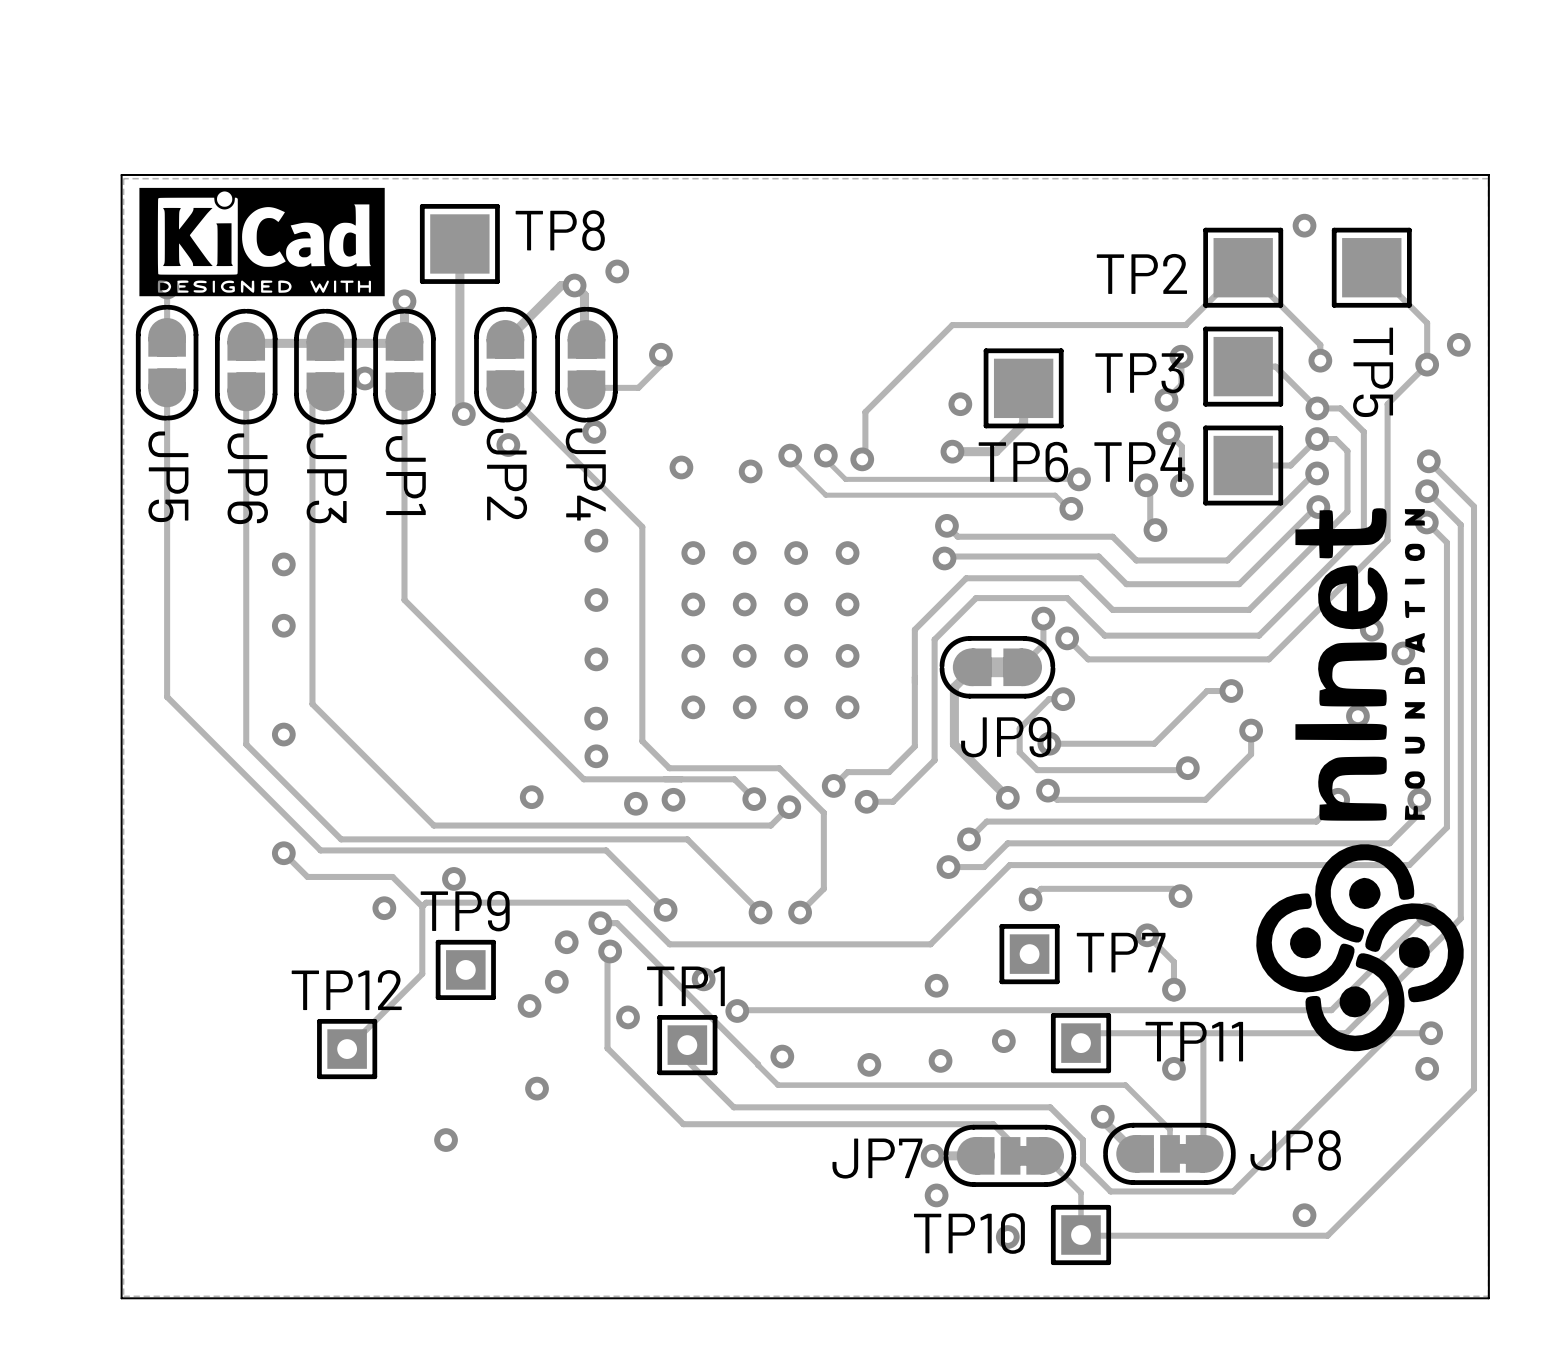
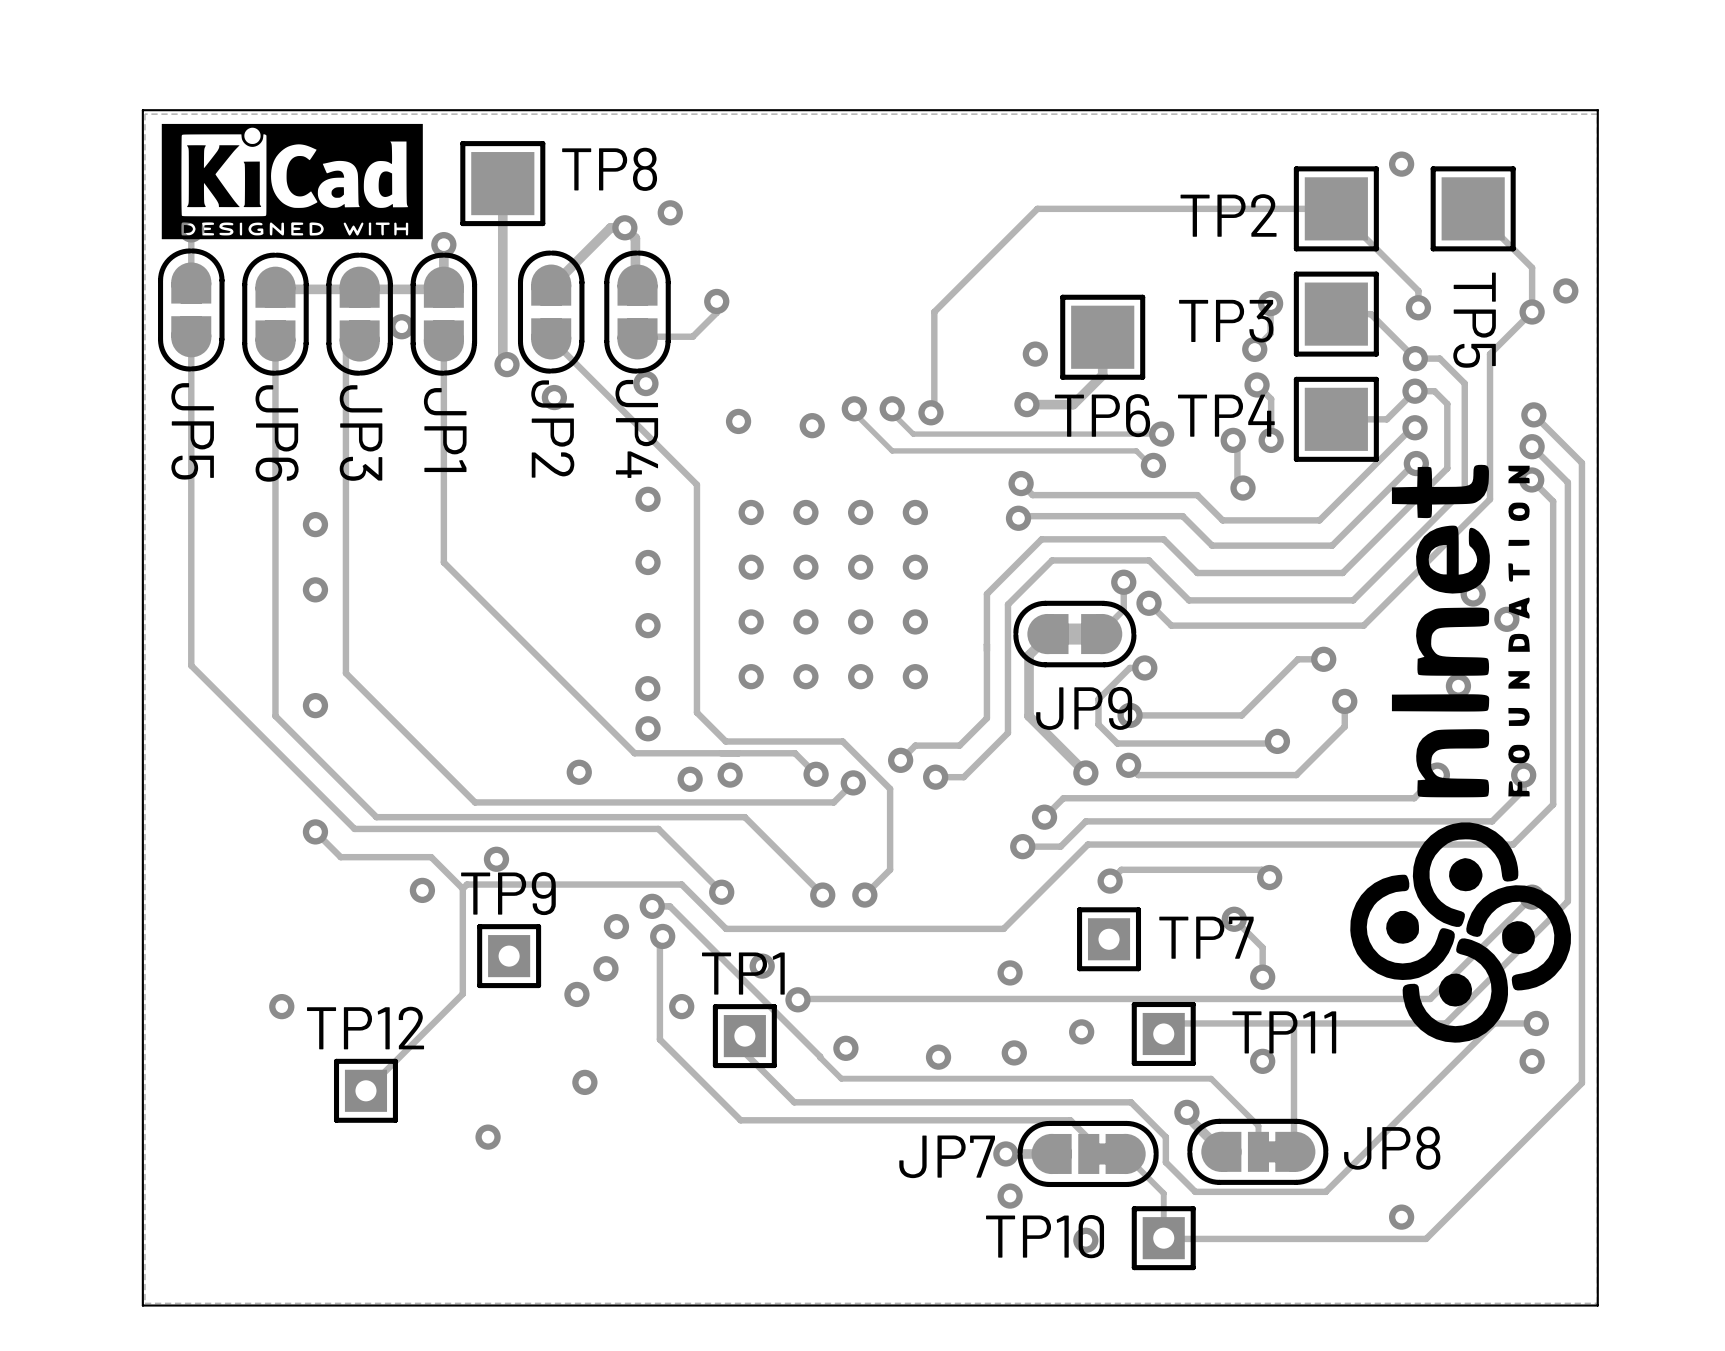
track: (1243, 267) (1185, 325) (952, 325) (865, 412) -> (1336, 208) (1037, 208) (934, 311) (934, 362)
track: (422, 973) (347, 1049) -> (462, 960) (462, 993) (365, 1090)
via: none -> (281, 1006)
TP12 position: (347, 1049) -> (365, 1090)

